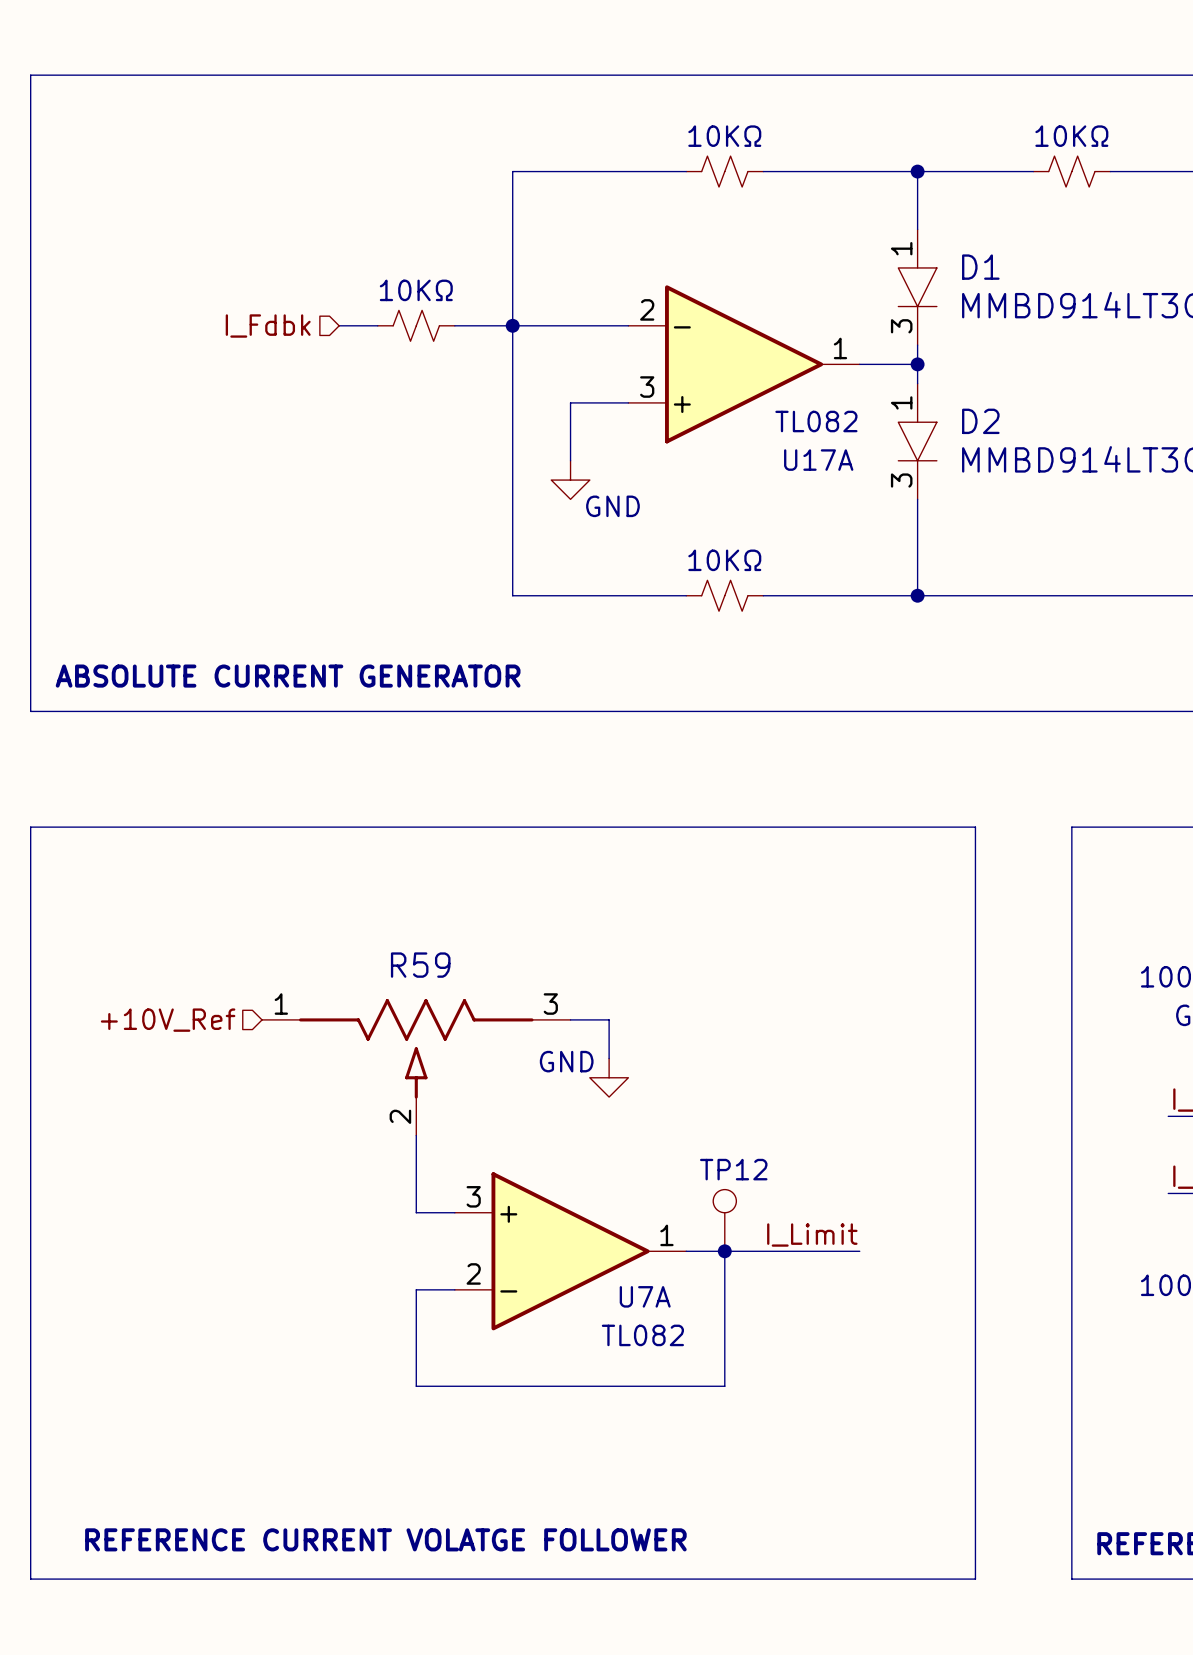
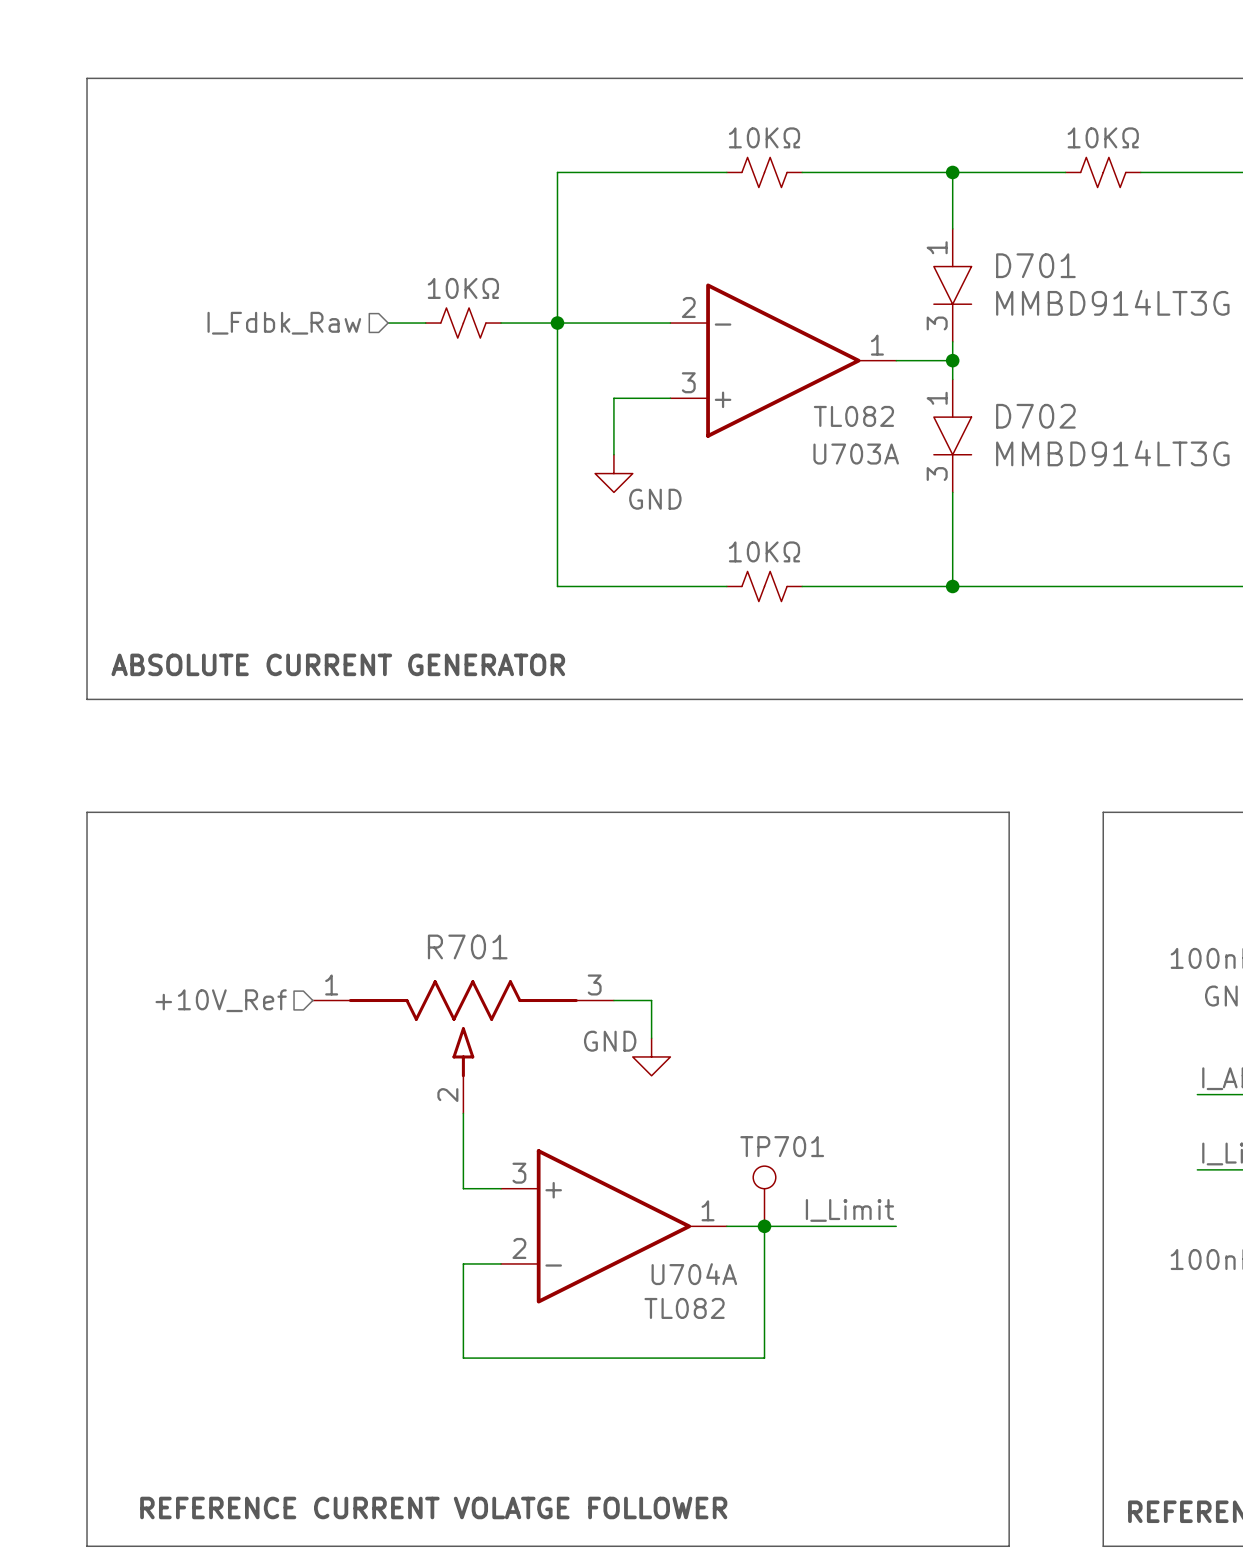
D1 name: D1 (980, 267) -> D701 (1035, 265)
hierarchical label: I_Fdbk (268, 326) -> I_Fdbk_Raw (284, 323)
D2 name: D2 (980, 421) -> D702 (1035, 416)
U17A name: U17A (818, 460) -> U703A (856, 454)
R59 name: R59 (420, 965) -> R701 (467, 946)
TP12 name: TP12 (733, 1169) -> TP701 (782, 1146)
U7A name: U7A (645, 1296) -> U704A (694, 1274)

